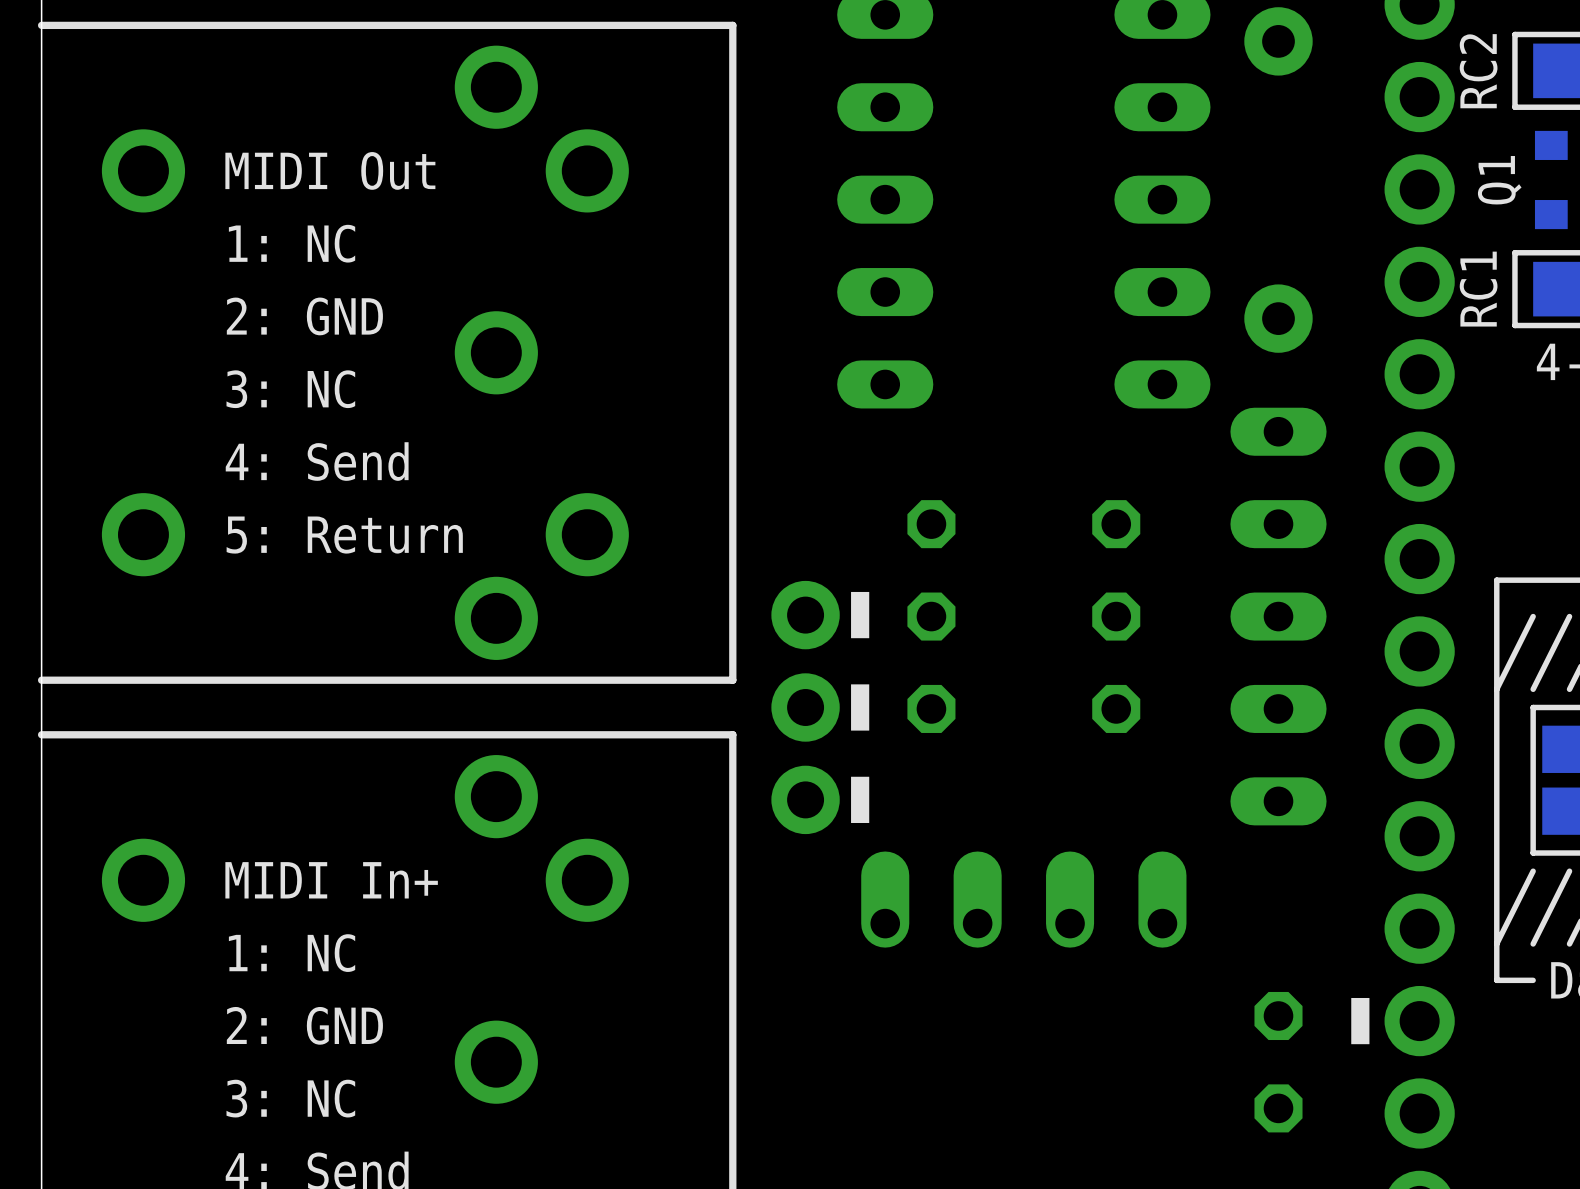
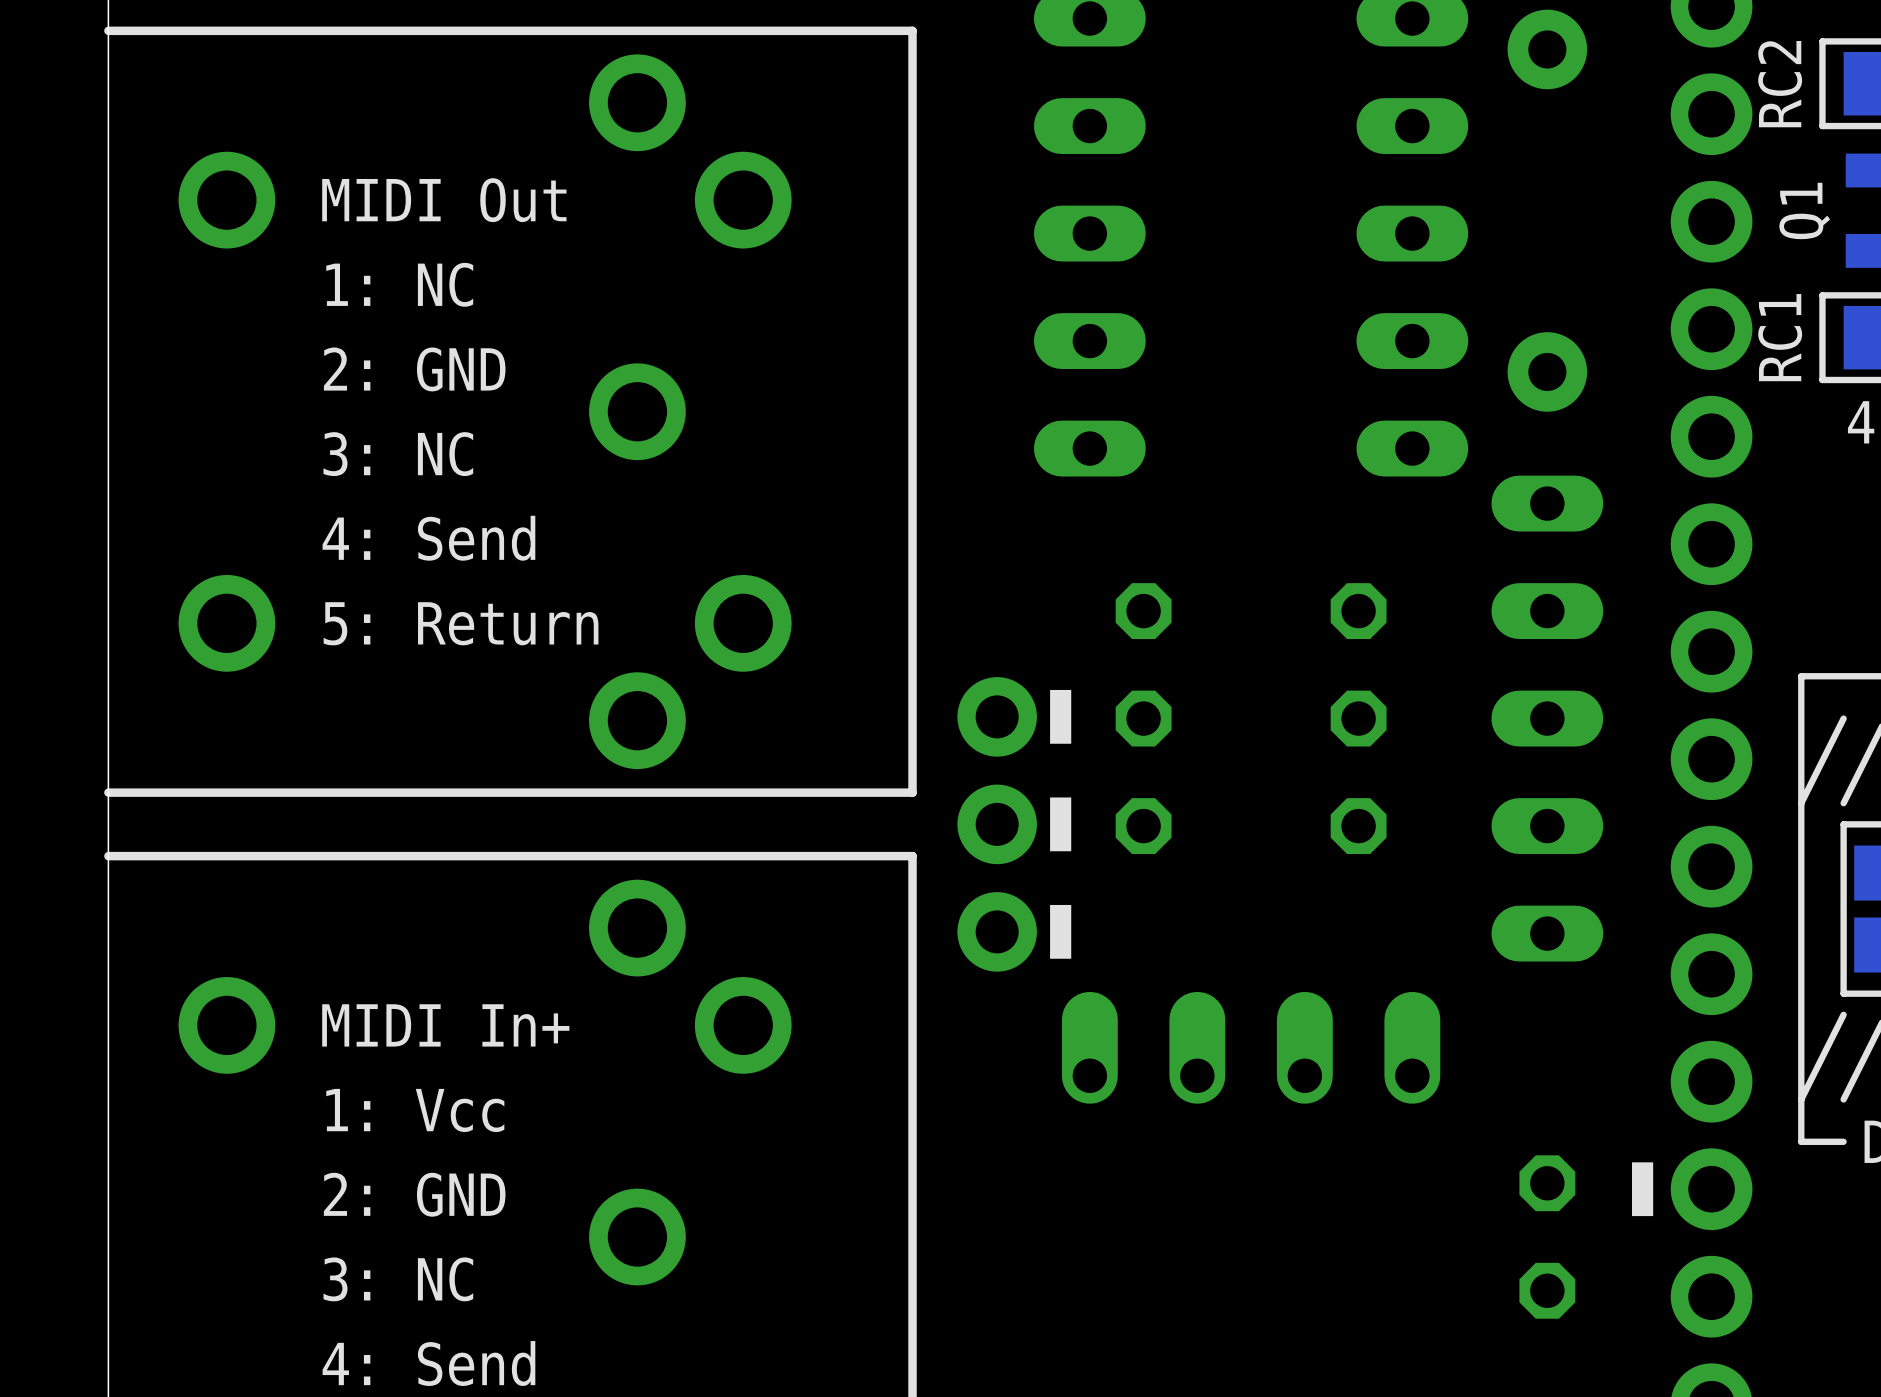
text: 1: NC (292, 953) -> 1: Vcc (415, 1110)

